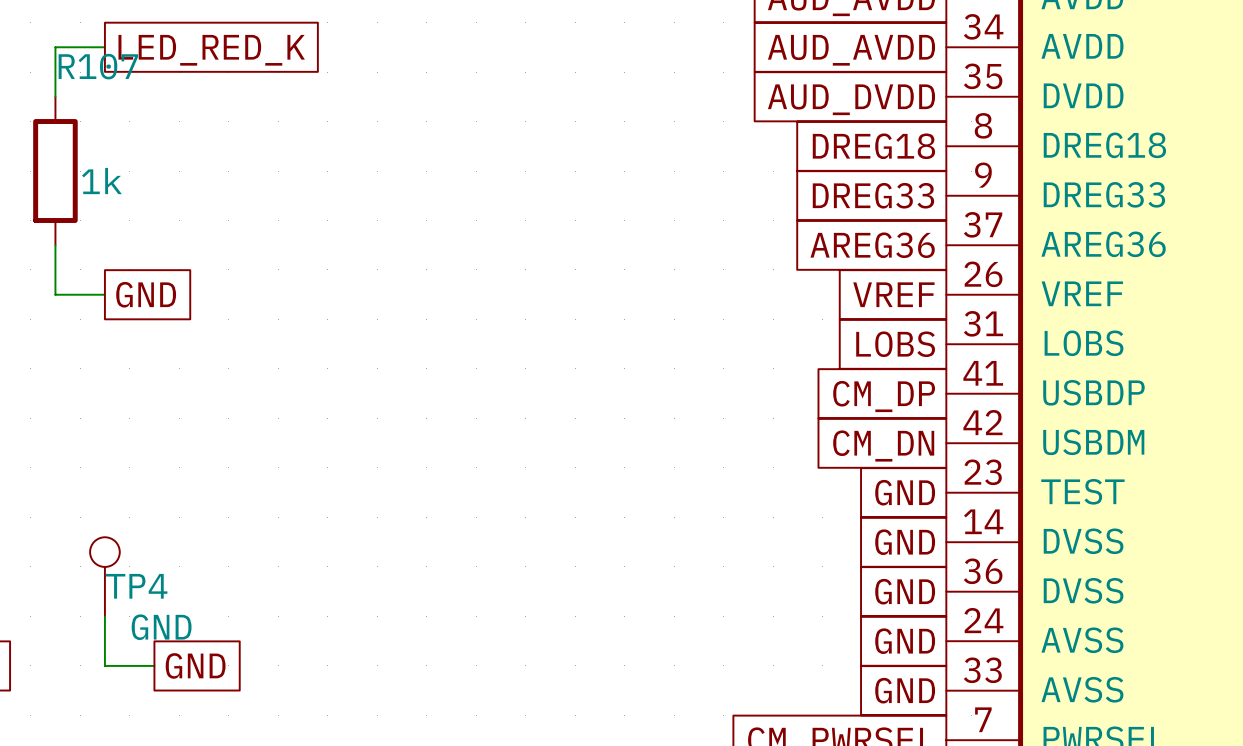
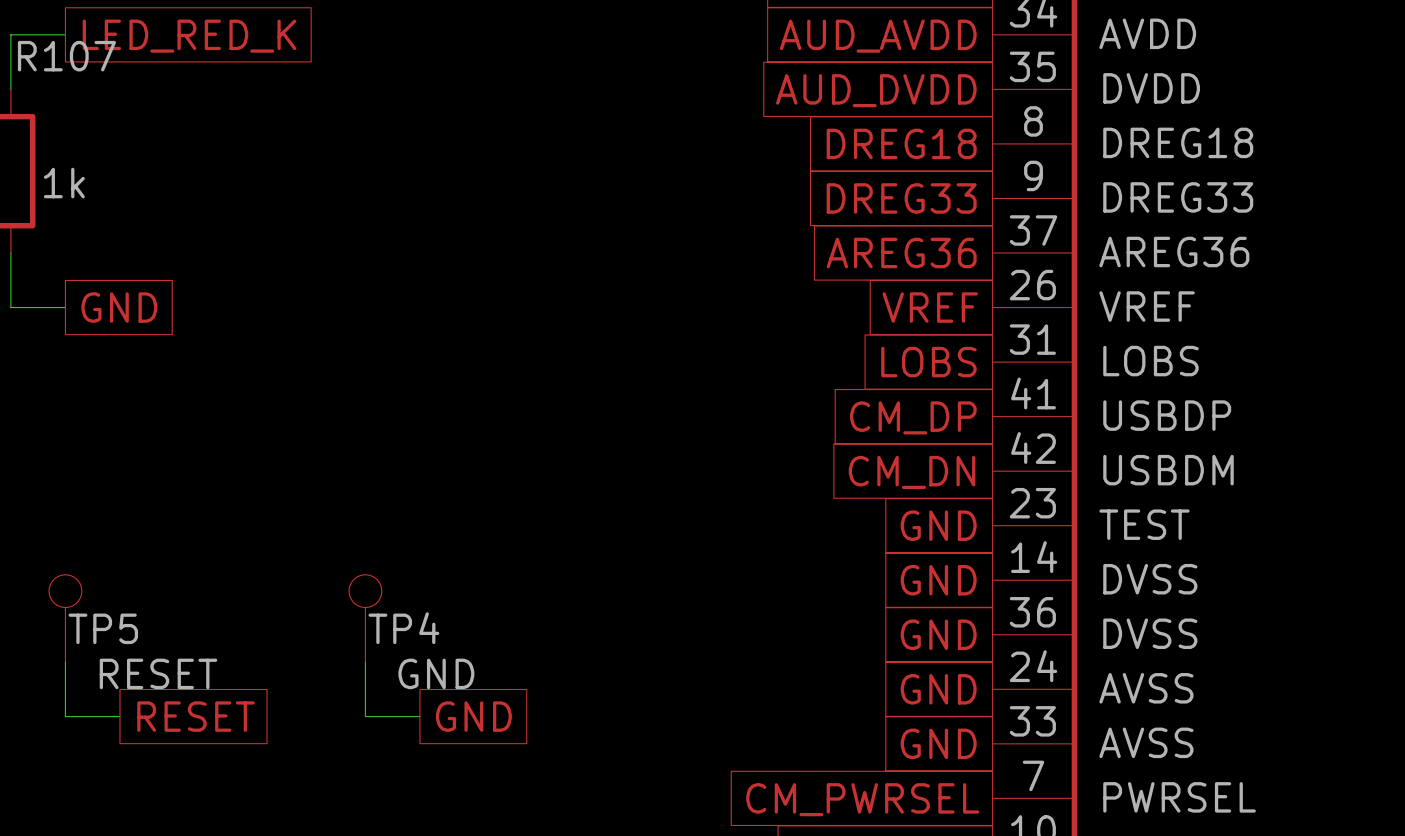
TP4: none -> GND (365, 618)
TP4 name: TP4 (136, 586) -> TP5 (103, 628)
wire: none -> (365, 662) (365, 716) (419, 716)
TP4 value: GND (161, 627) -> RESET (158, 673)
global label: GND (195, 665) -> RESET (195, 716)
global label: none -> GND (473, 716)

